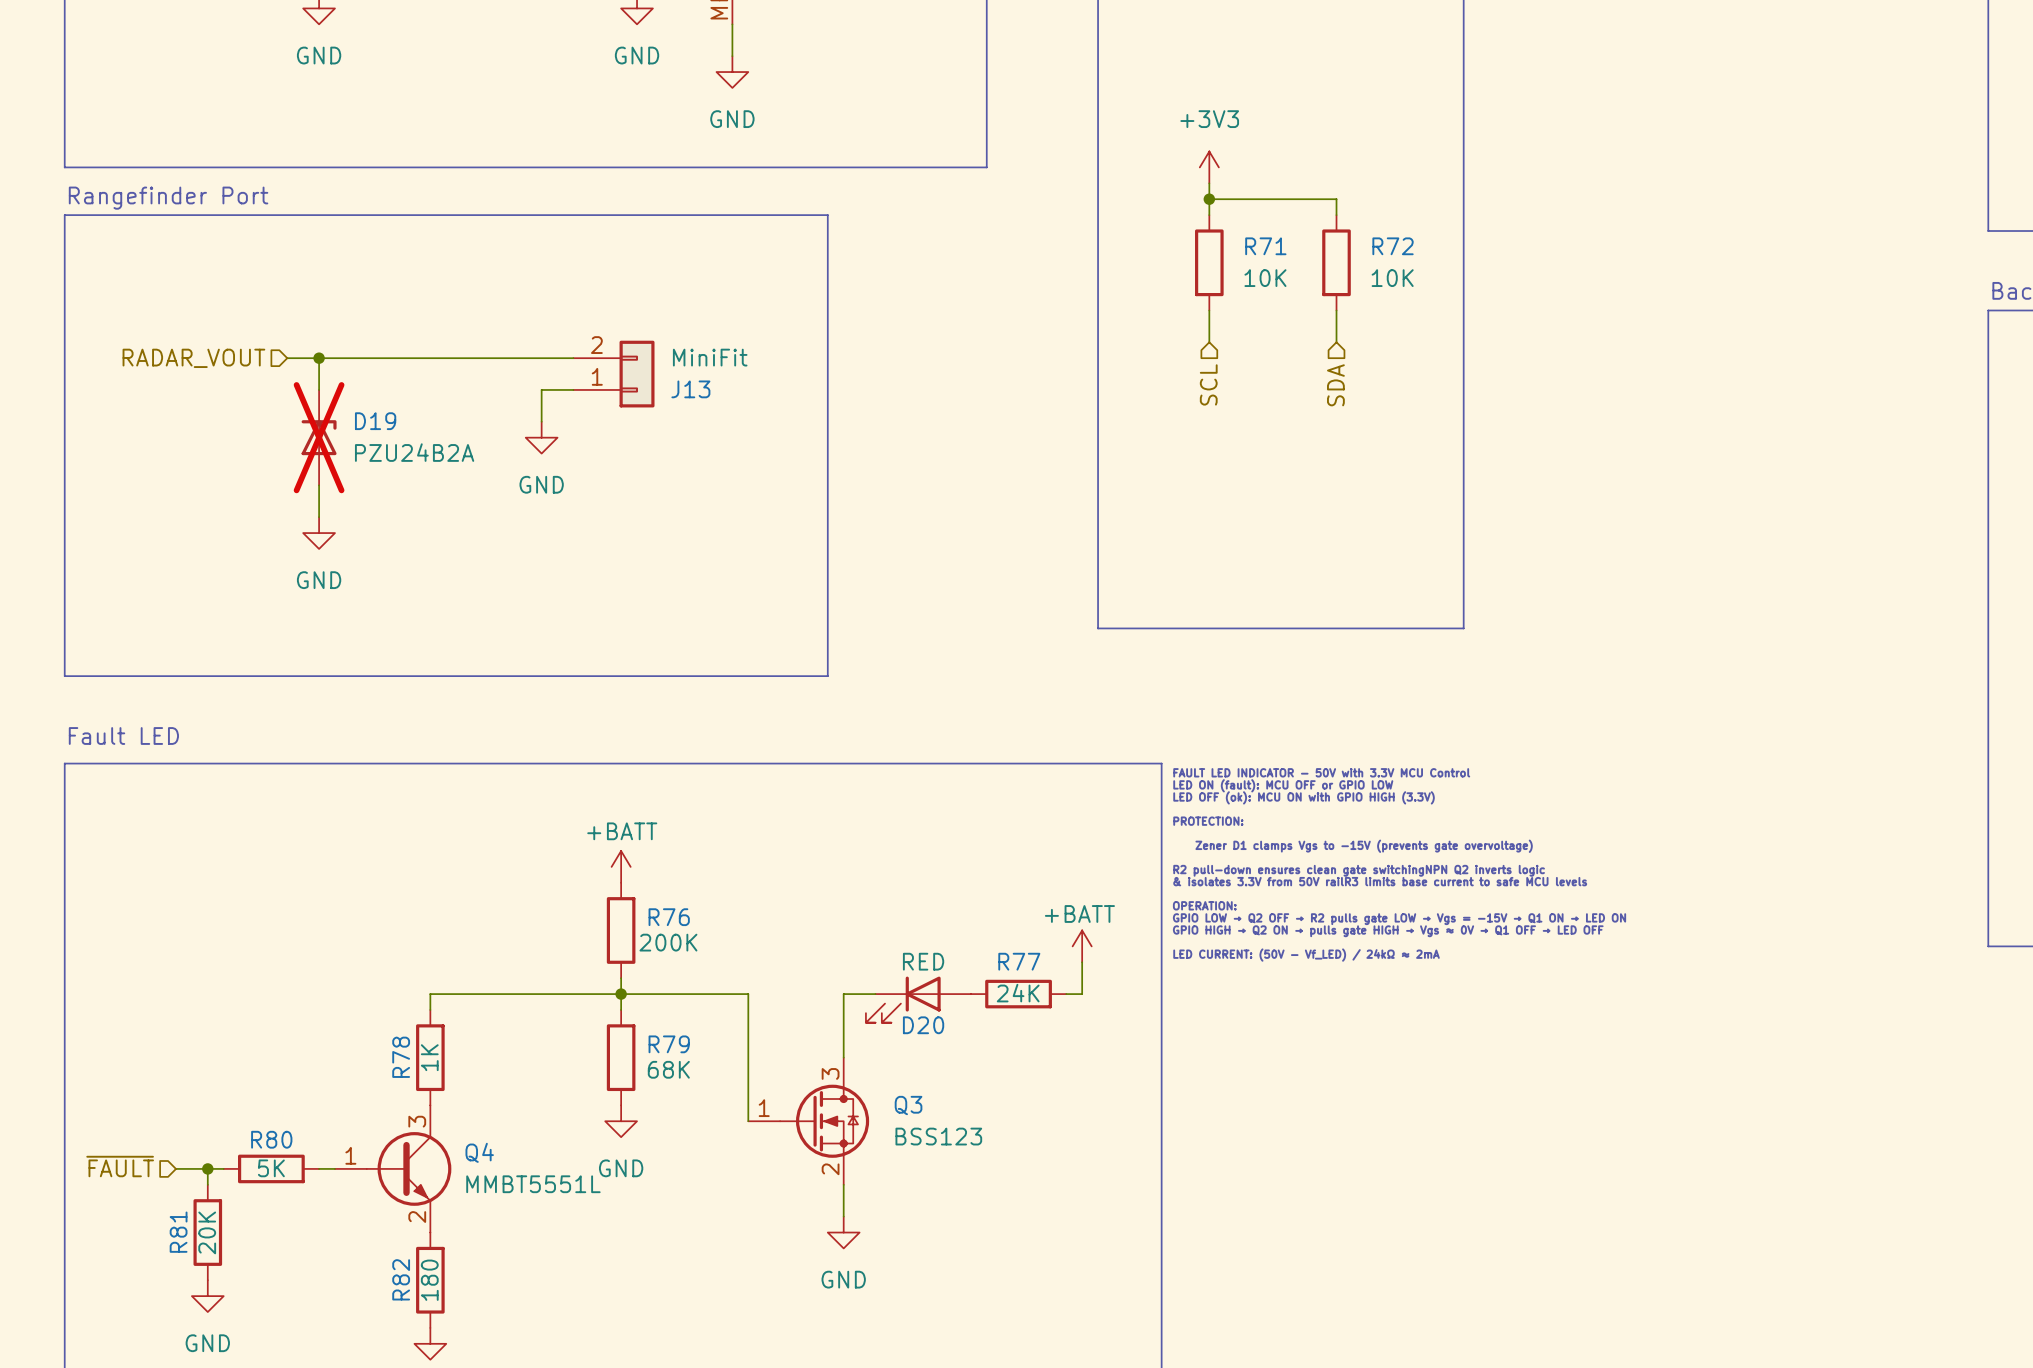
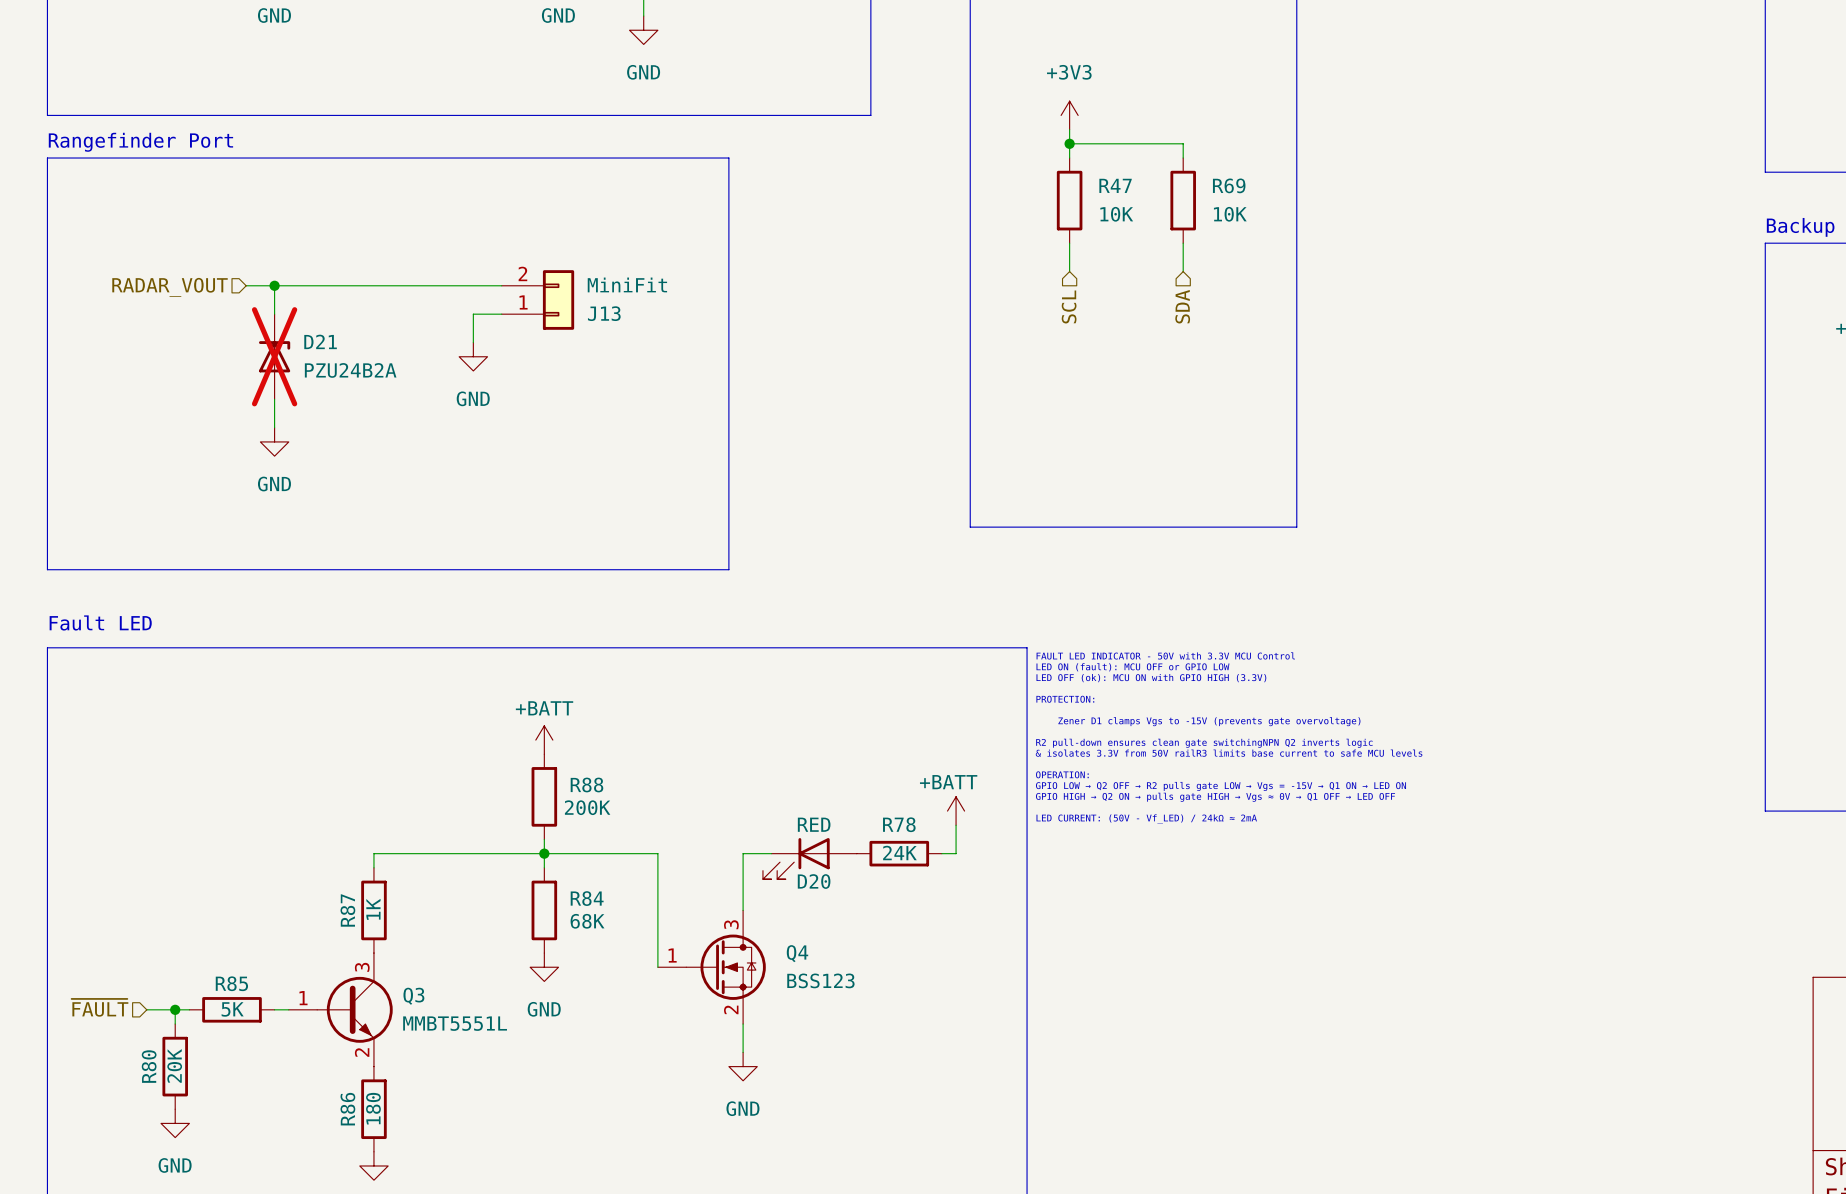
R71 name: R71 (1265, 246) -> R47 (1115, 185)
R72 name: R72 (1393, 246) -> R69 (1229, 185)
D19 name: D19 (375, 421) -> D21 (320, 341)
R76 name: R76 (669, 917) -> R88 (586, 784)
R77 name: R77 (1019, 961) -> R78 (899, 824)
R79 name: R79 (669, 1044) -> R84 (587, 898)
R78 name: R78 (401, 1057) -> R87 (347, 910)
Q3 name: Q3 (908, 1105) -> Q4 (797, 953)
R80 name: R80 (271, 1139) -> R85 (231, 983)
Q4 name: Q4 (479, 1152) -> Q3 (413, 996)
R81 name: R81 (178, 1232) -> R80 (149, 1066)
R82 name: R82 (401, 1279) -> R86 (347, 1109)

